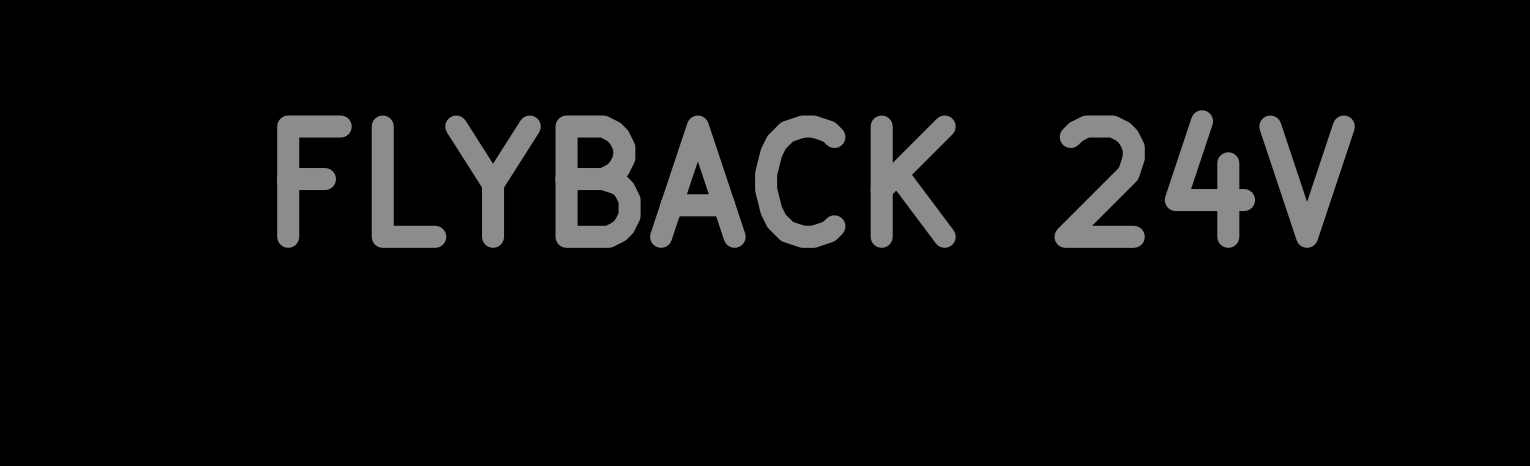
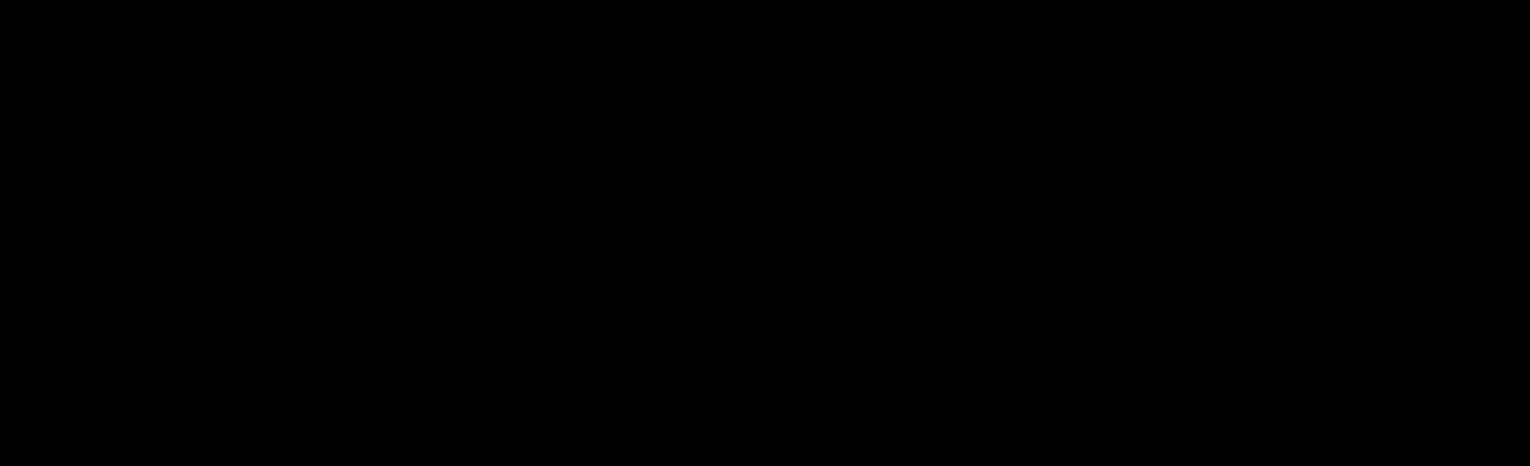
text: FLYBACK 24V (816, 179) -> none

